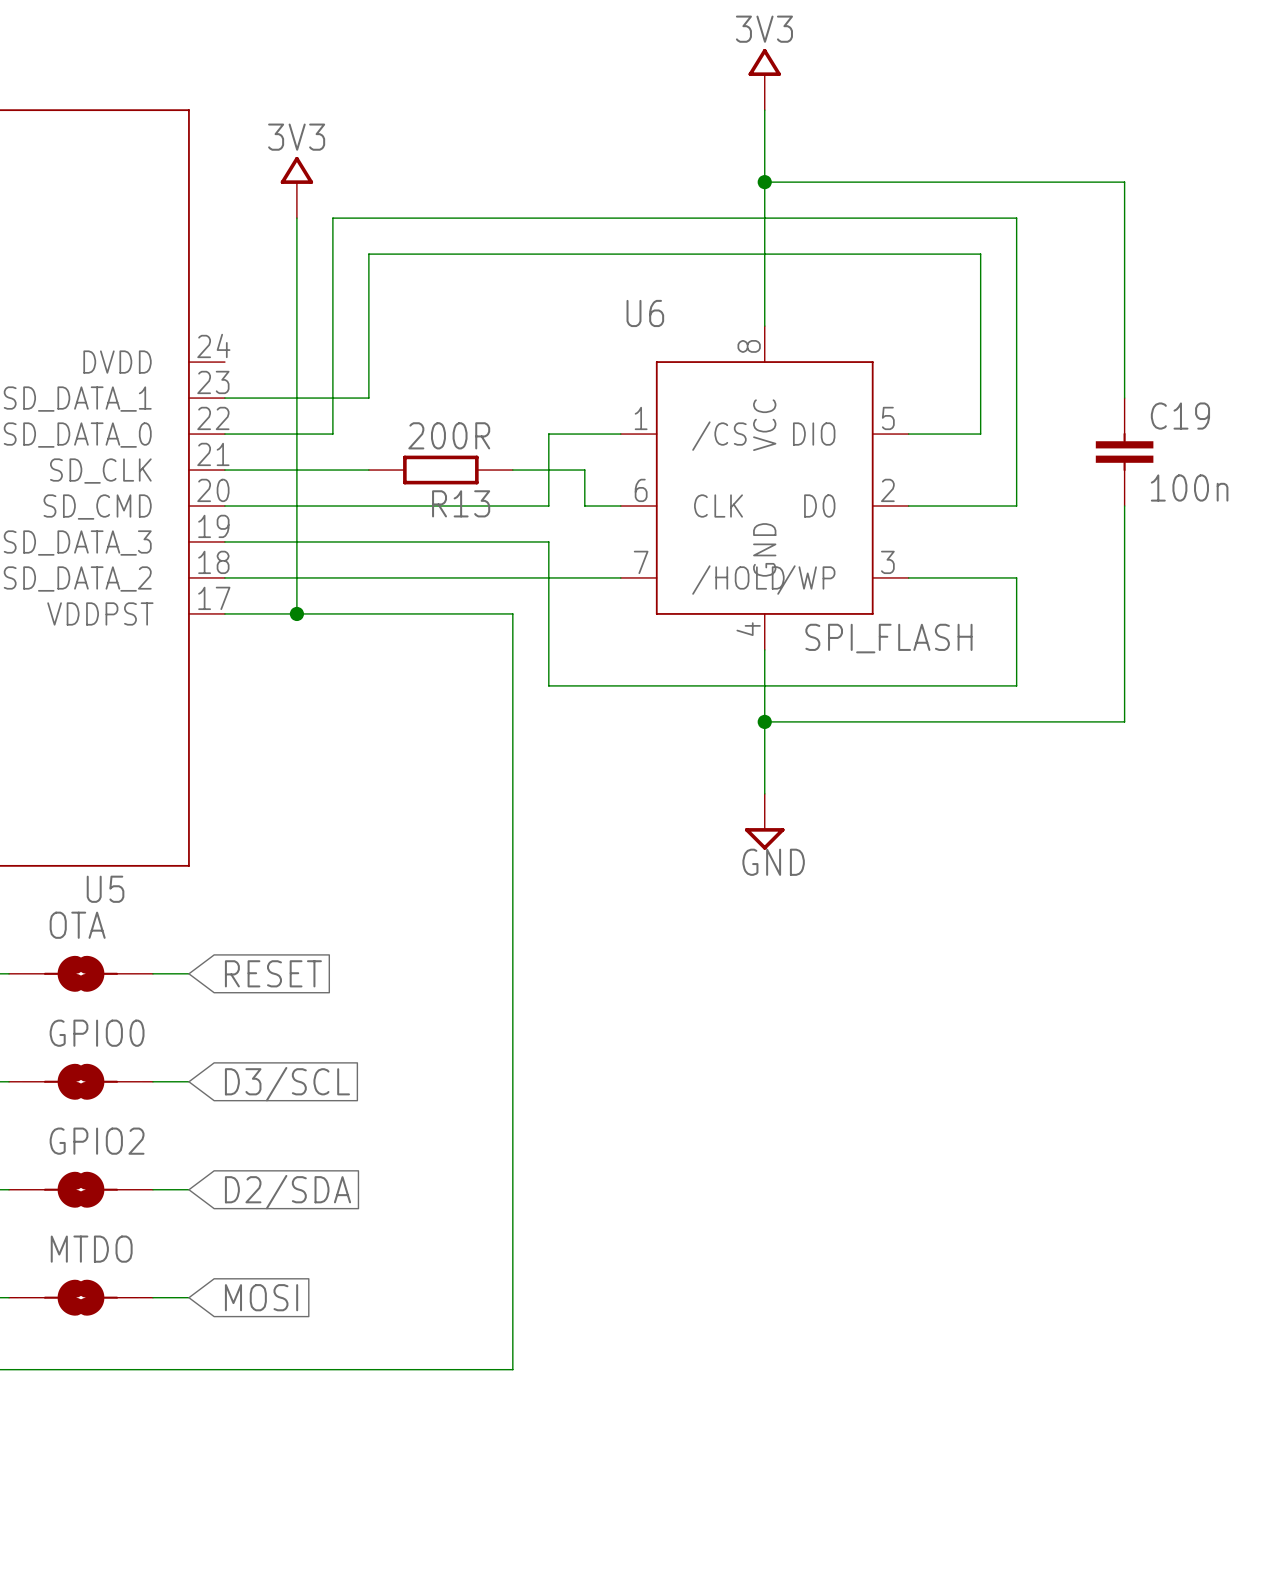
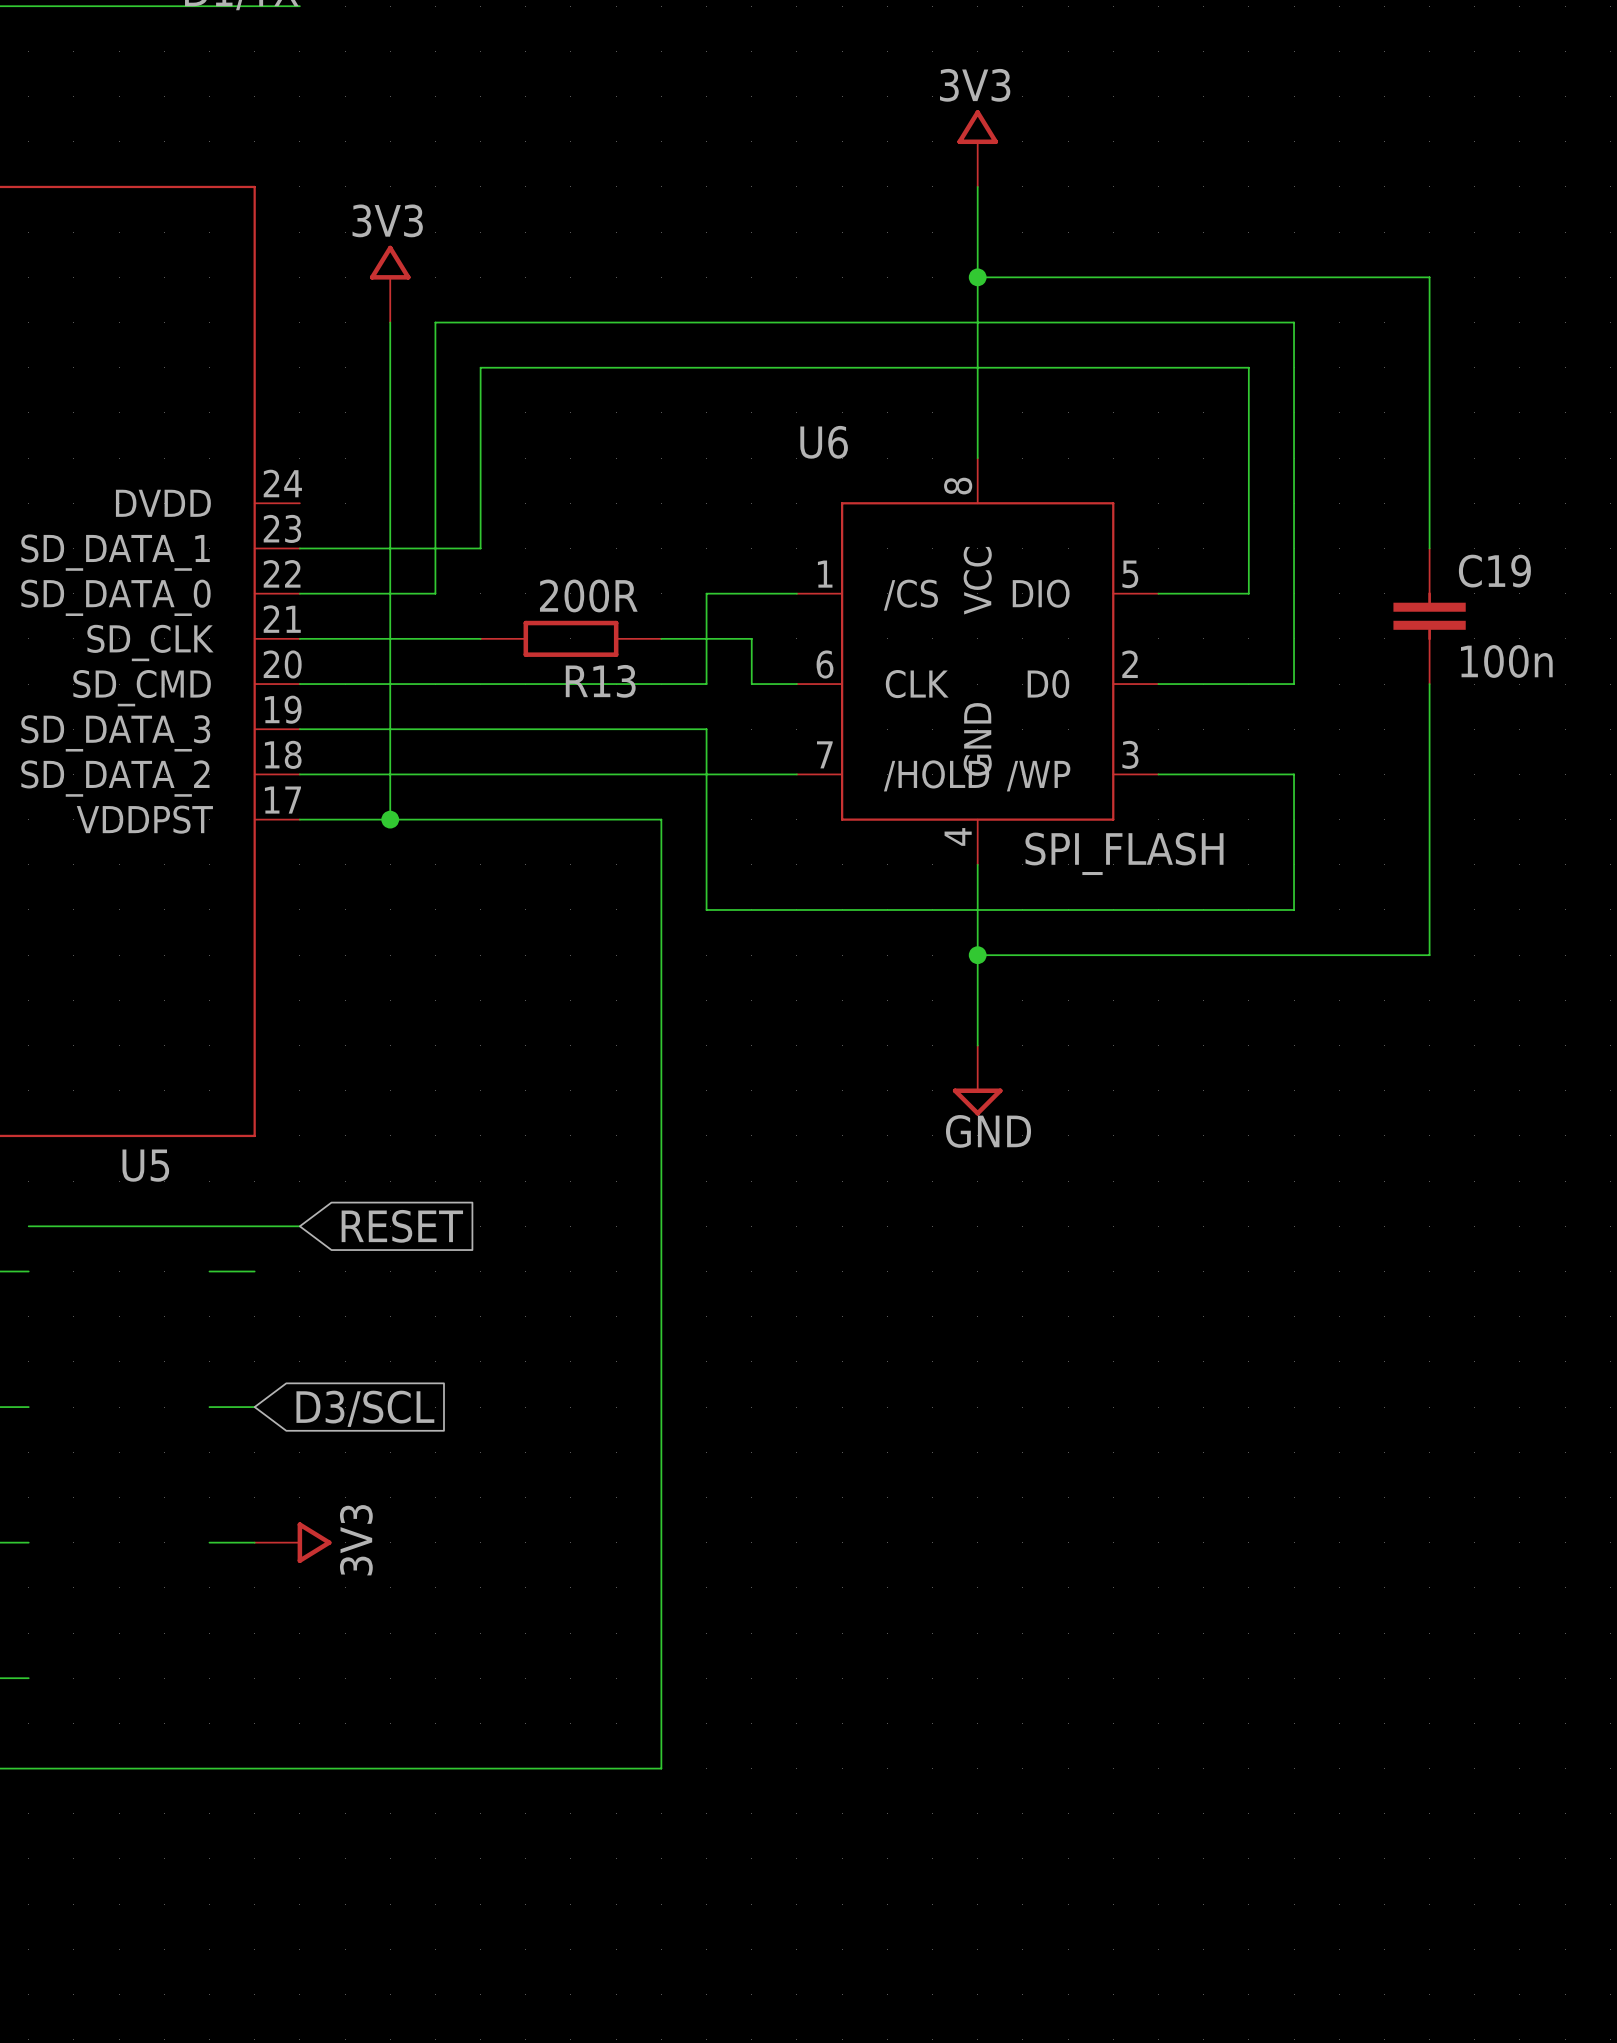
wire: none -> (28, 1226) (299, 1226)
OTA: (81, 973) -> none
global label position: RESET (273, 973) -> RESET (402, 1226)
GPIO0: (81, 1081) -> none
GPIO2: (81, 1189) -> none
power symbol: none -> 3V3 (293, 1542)
global label: D2/SDA (287, 1192) -> none
MTDO: (81, 1297) -> none
wire: (152, 1297) (188, 1297) -> none
global label: MOSI (261, 1297) -> none

